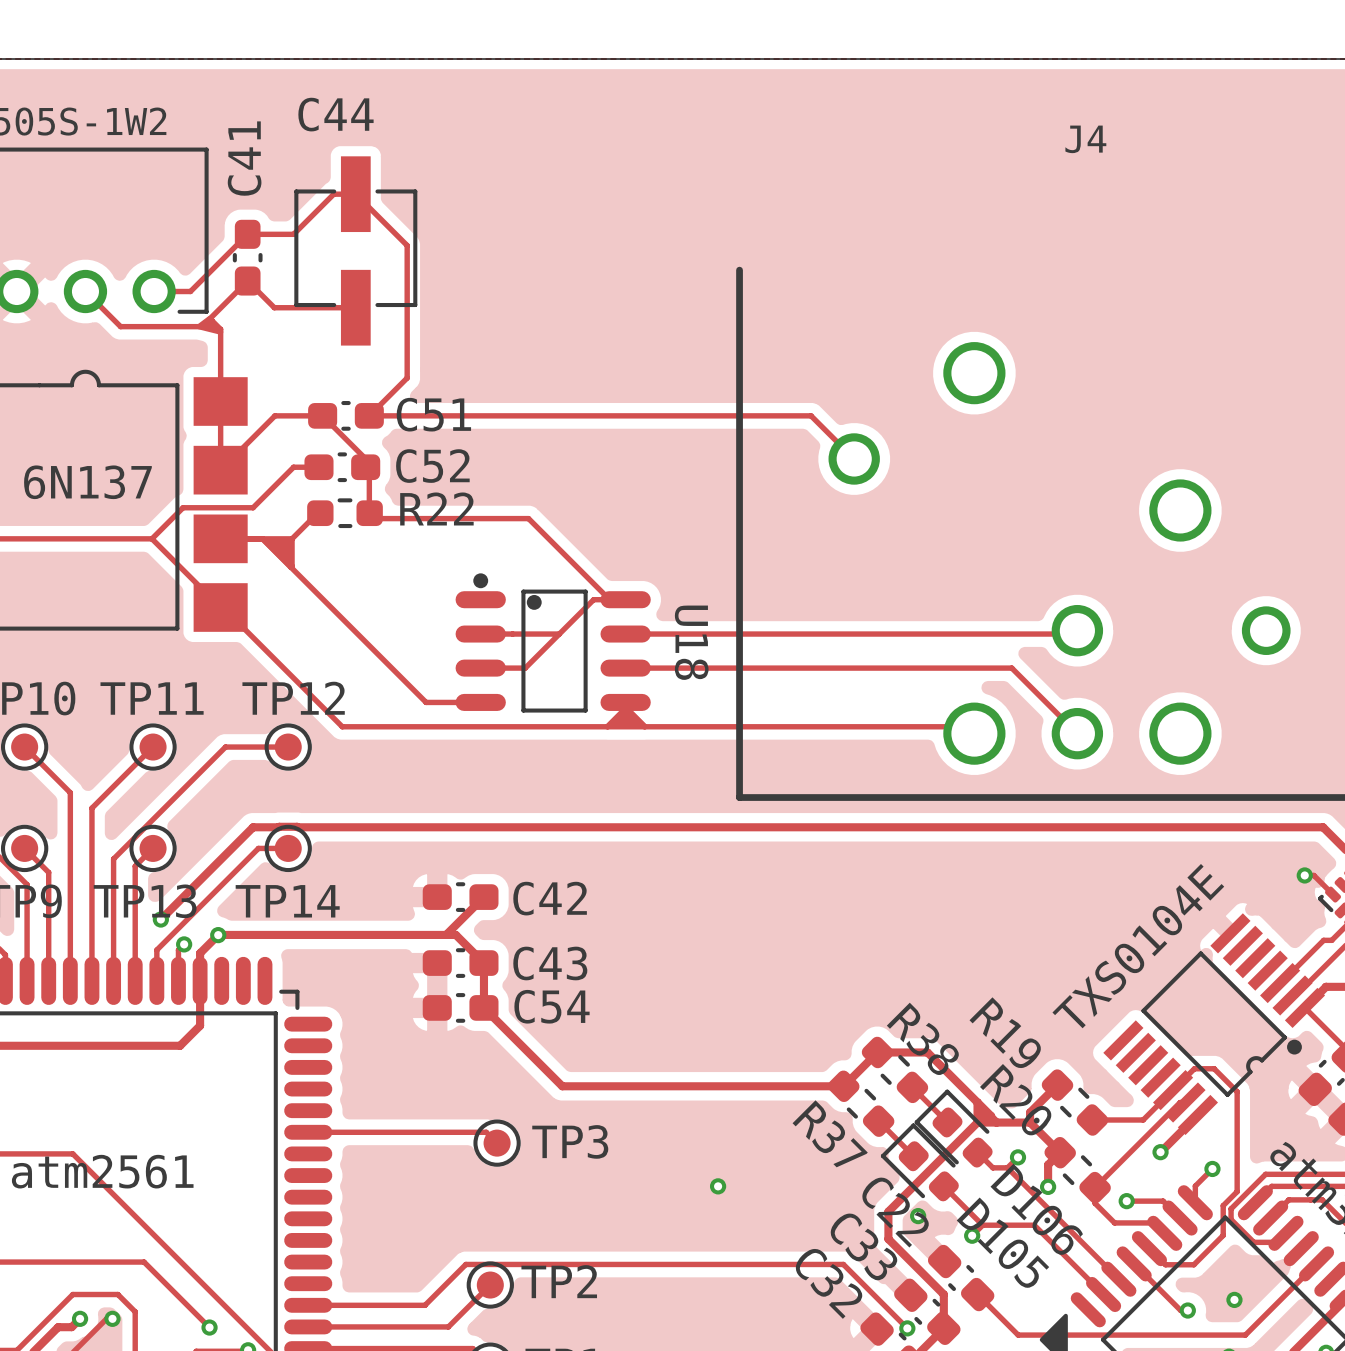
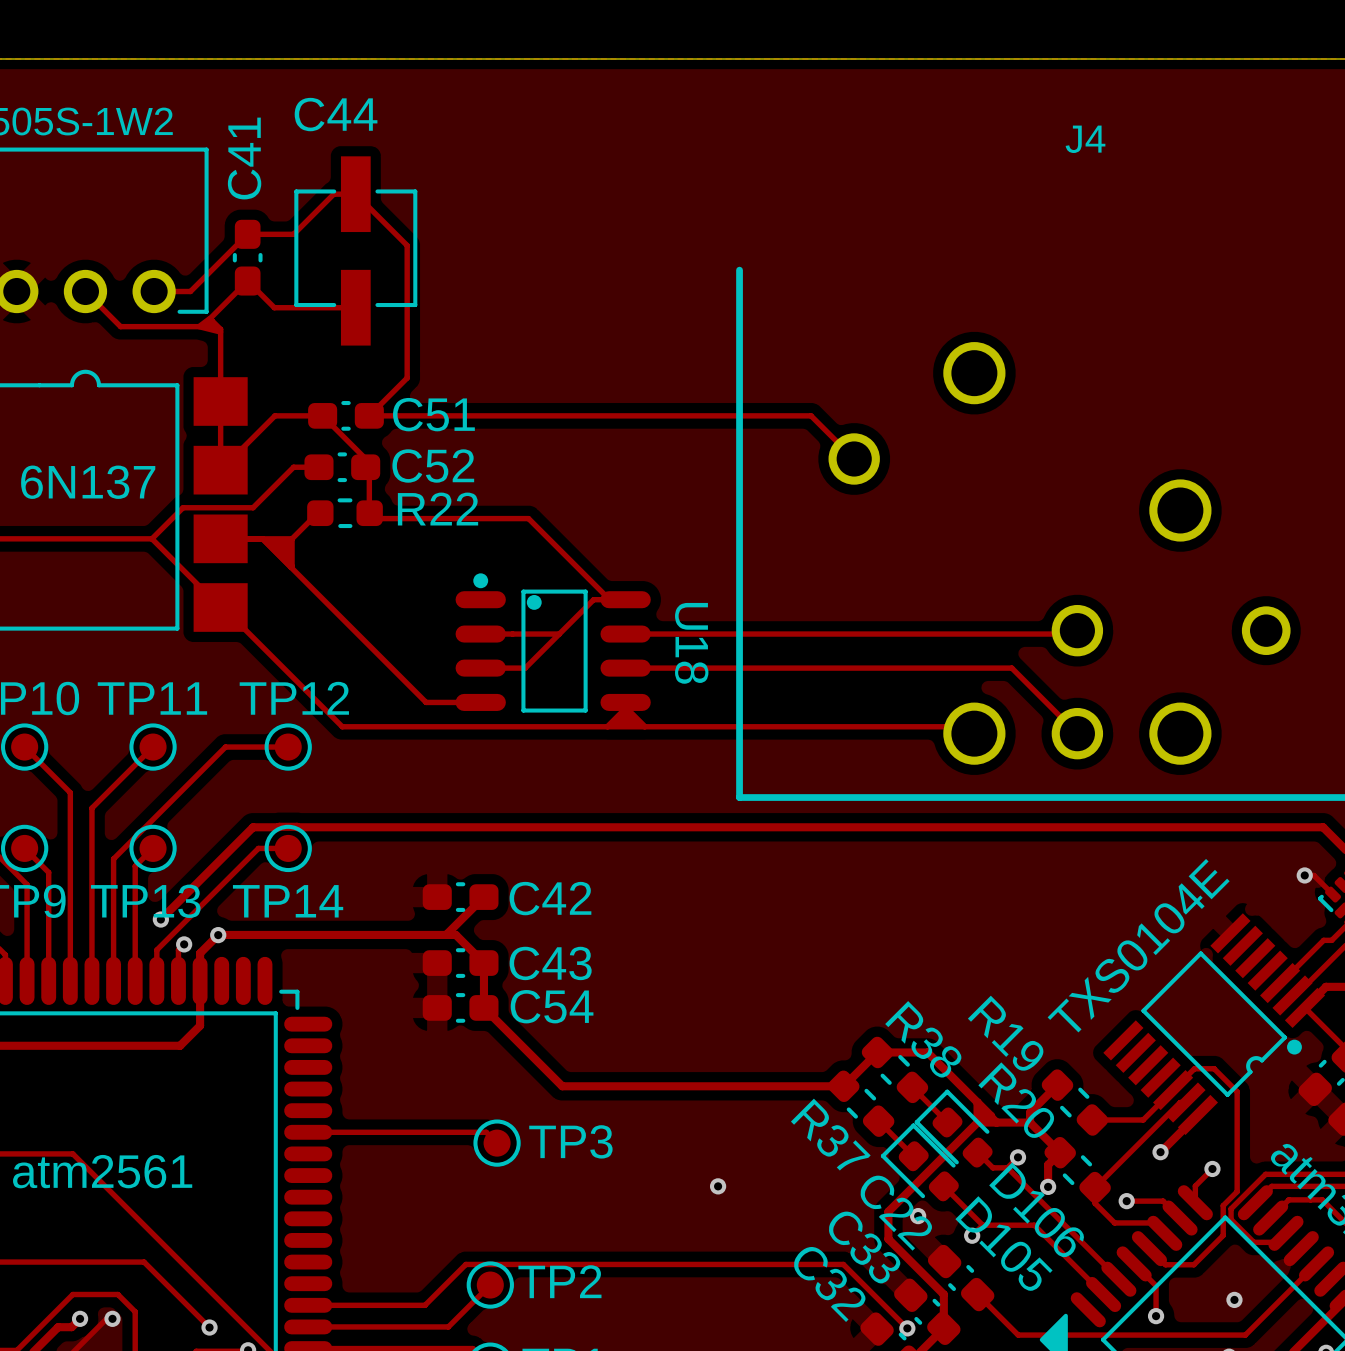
track: (1156, 1285) (1180, 1310) (1187, 1310) -> (1156, 1285) (1156, 1316)
via position: (1187, 1310) -> (1156, 1316)

